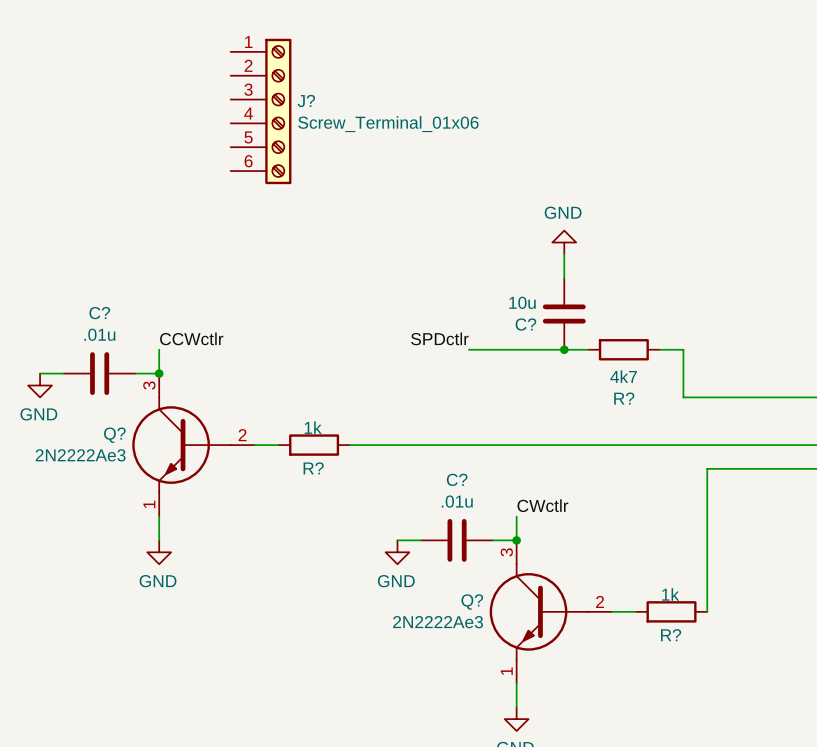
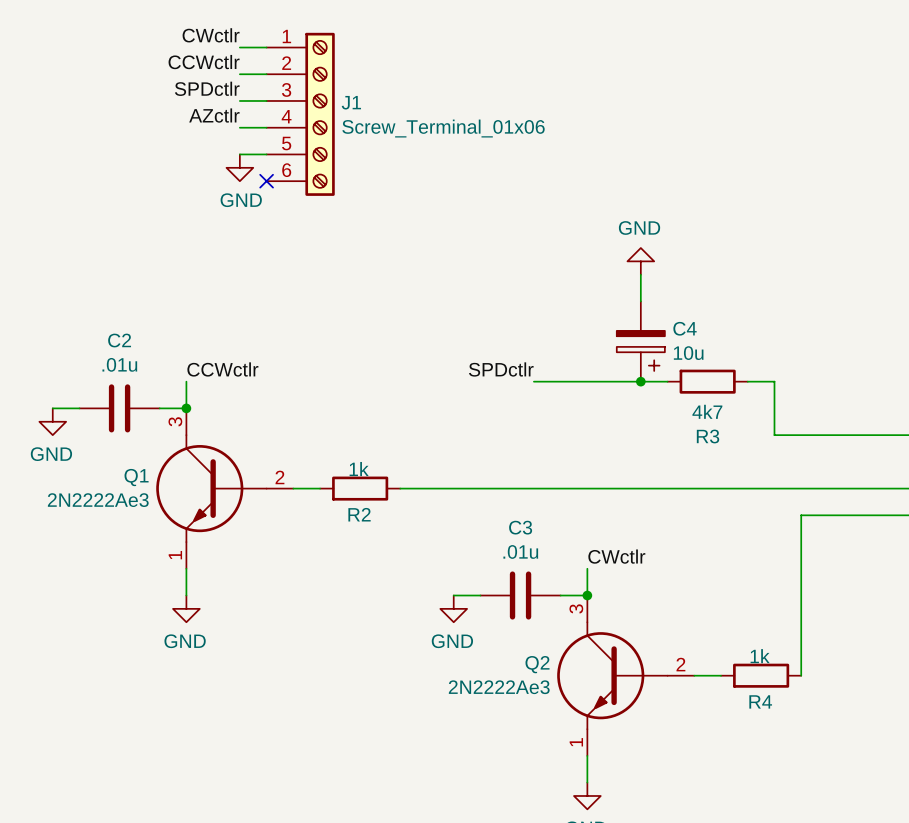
label: none -> CWctlr (211, 35)
wire: none -> (239, 47) (266, 47)
label: none -> CCWctlr (204, 62)
wire: none -> (239, 74) (266, 74)
label: none -> SPDctlr (207, 88)
wire: none -> (239, 100) (266, 100)
J? name: J? (306, 101) -> J1 (351, 102)
label: none -> AZctlr (214, 115)
wire: none -> (239, 127) (266, 127)
wire: none -> (239, 154) (266, 154)
power symbol: none -> GND (239, 167)
no-connect mark: none -> (266, 181)
C? name: C? (99, 313) -> C2 (119, 340)
C?: 10u (564, 314) -> none
C4: none -> 10u (640, 341)
R? name: R? (624, 398) -> R3 (708, 436)
Q? name: Q? (114, 435) -> Q1 (136, 477)
R? name: R? (313, 468) -> R2 (359, 514)
C? name: C? (457, 479) -> C3 (520, 527)
Q? name: Q? (472, 602) -> Q2 (537, 664)
R? name: R? (671, 635) -> R4 (760, 701)

